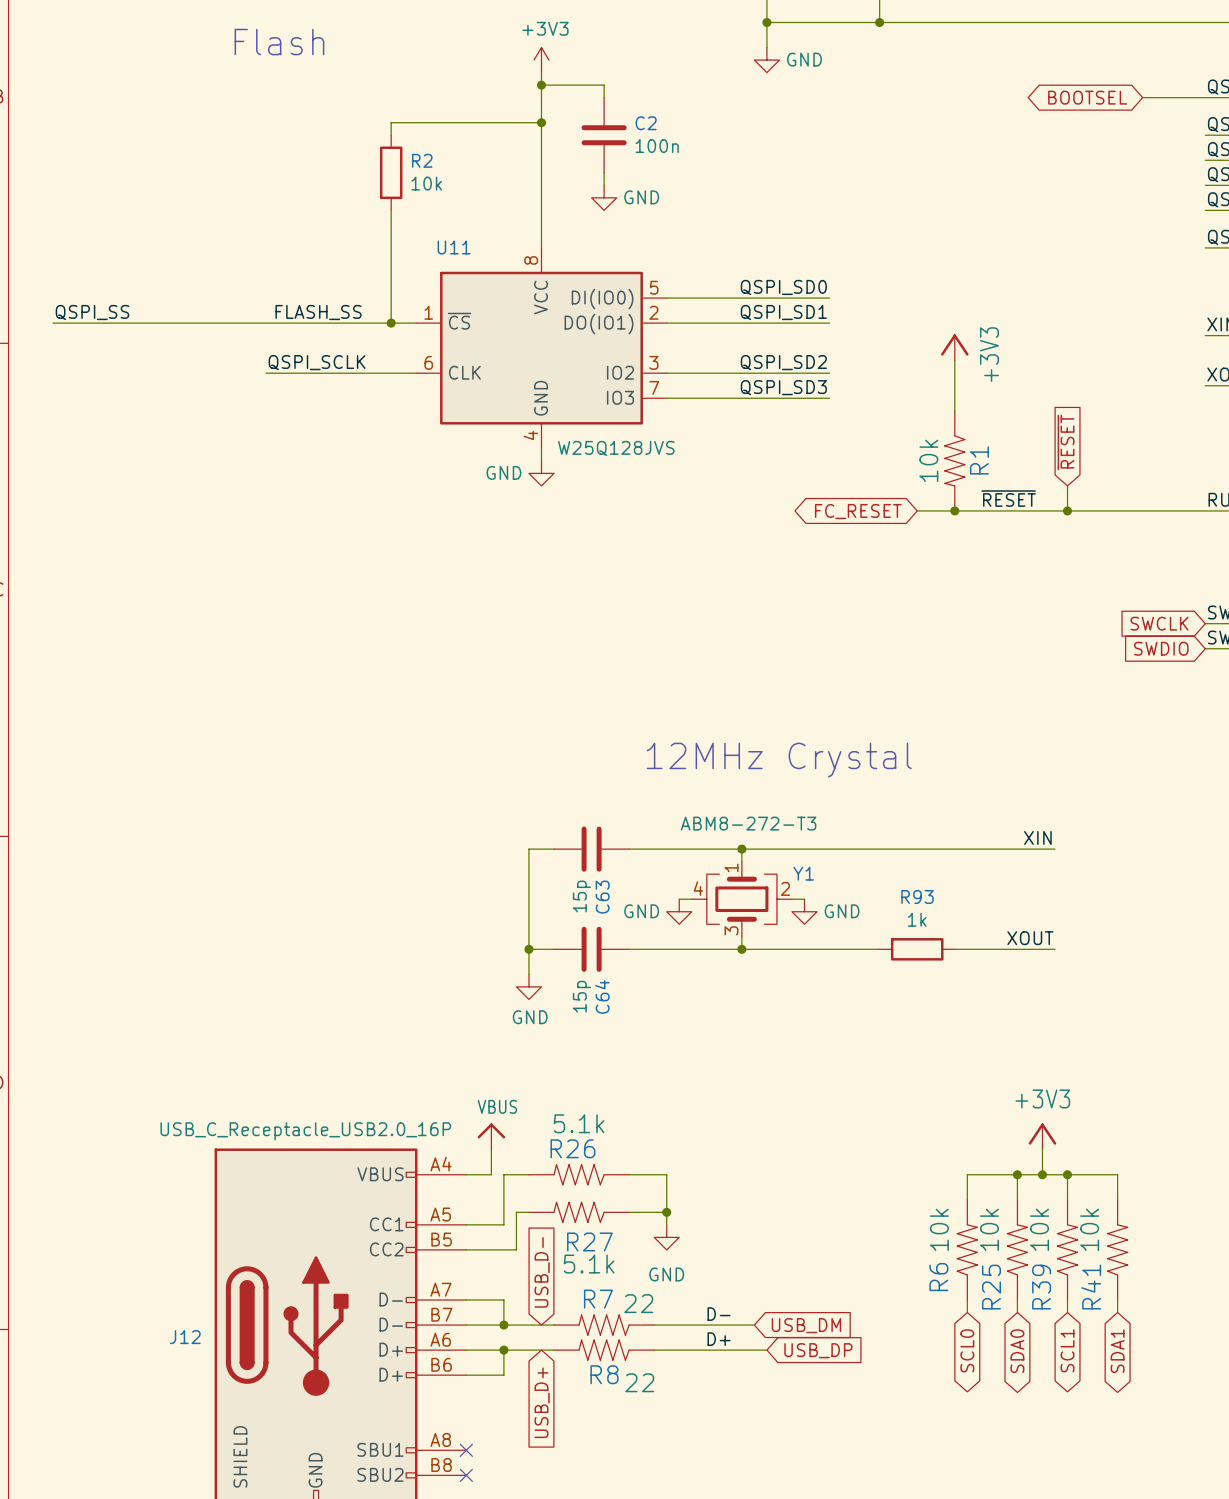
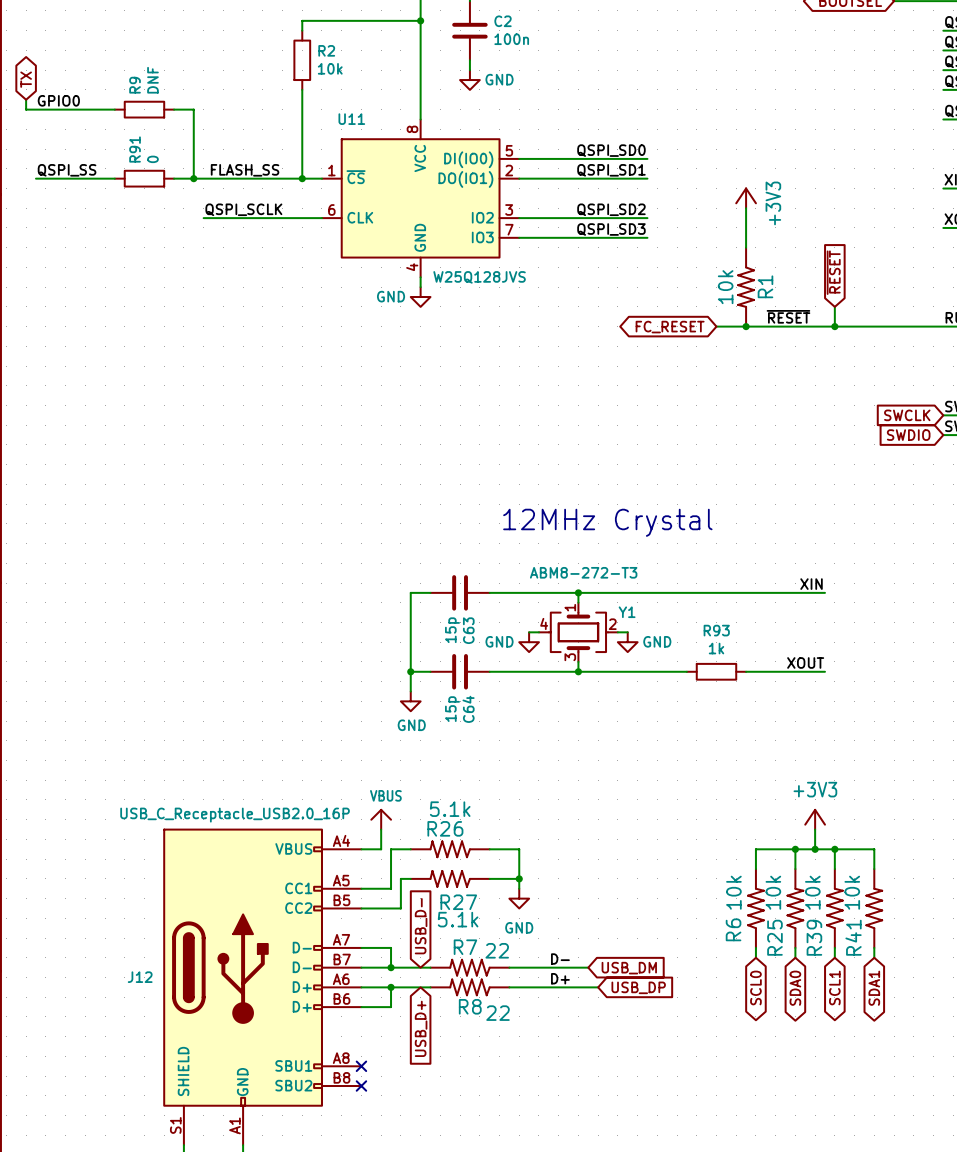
global label: none -> TX (26, 79)
wire: none -> (26, 99) (26, 109) (114, 109)
label: none -> GPIO0 (58, 100)
R9: none -> DNF (144, 109)
wire: none -> (174, 109) (193, 109) (193, 178)
wire: (153, 323) (228, 323) -> none
R91: none -> 0 (144, 178)
junction: none -> (193, 178)

